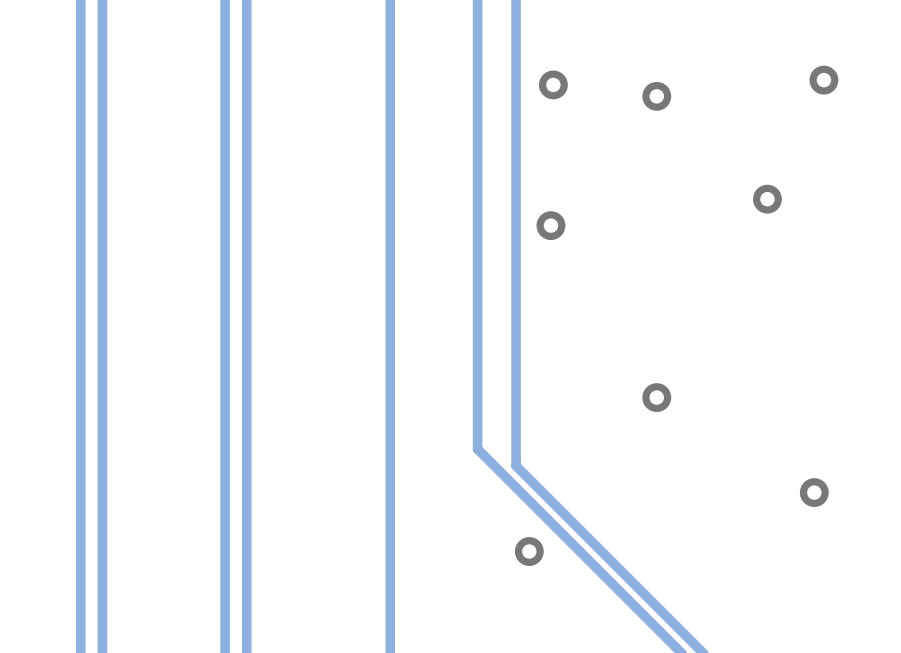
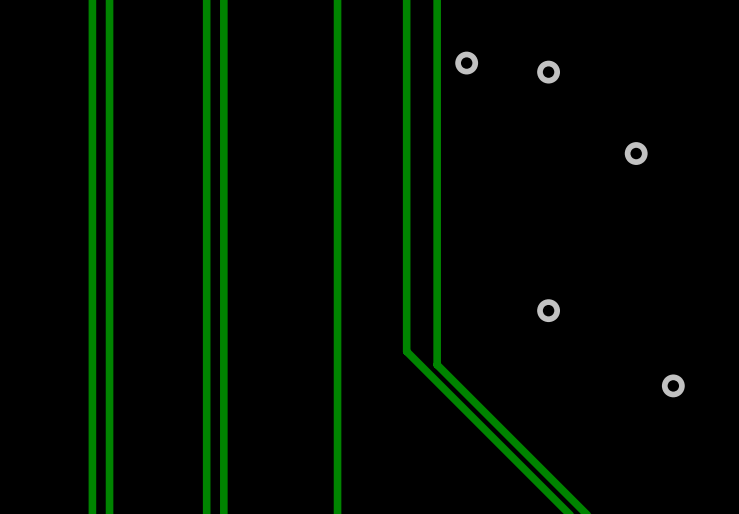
via: (823, 80) -> none
via: (550, 225) -> none
via: (529, 551) -> none

